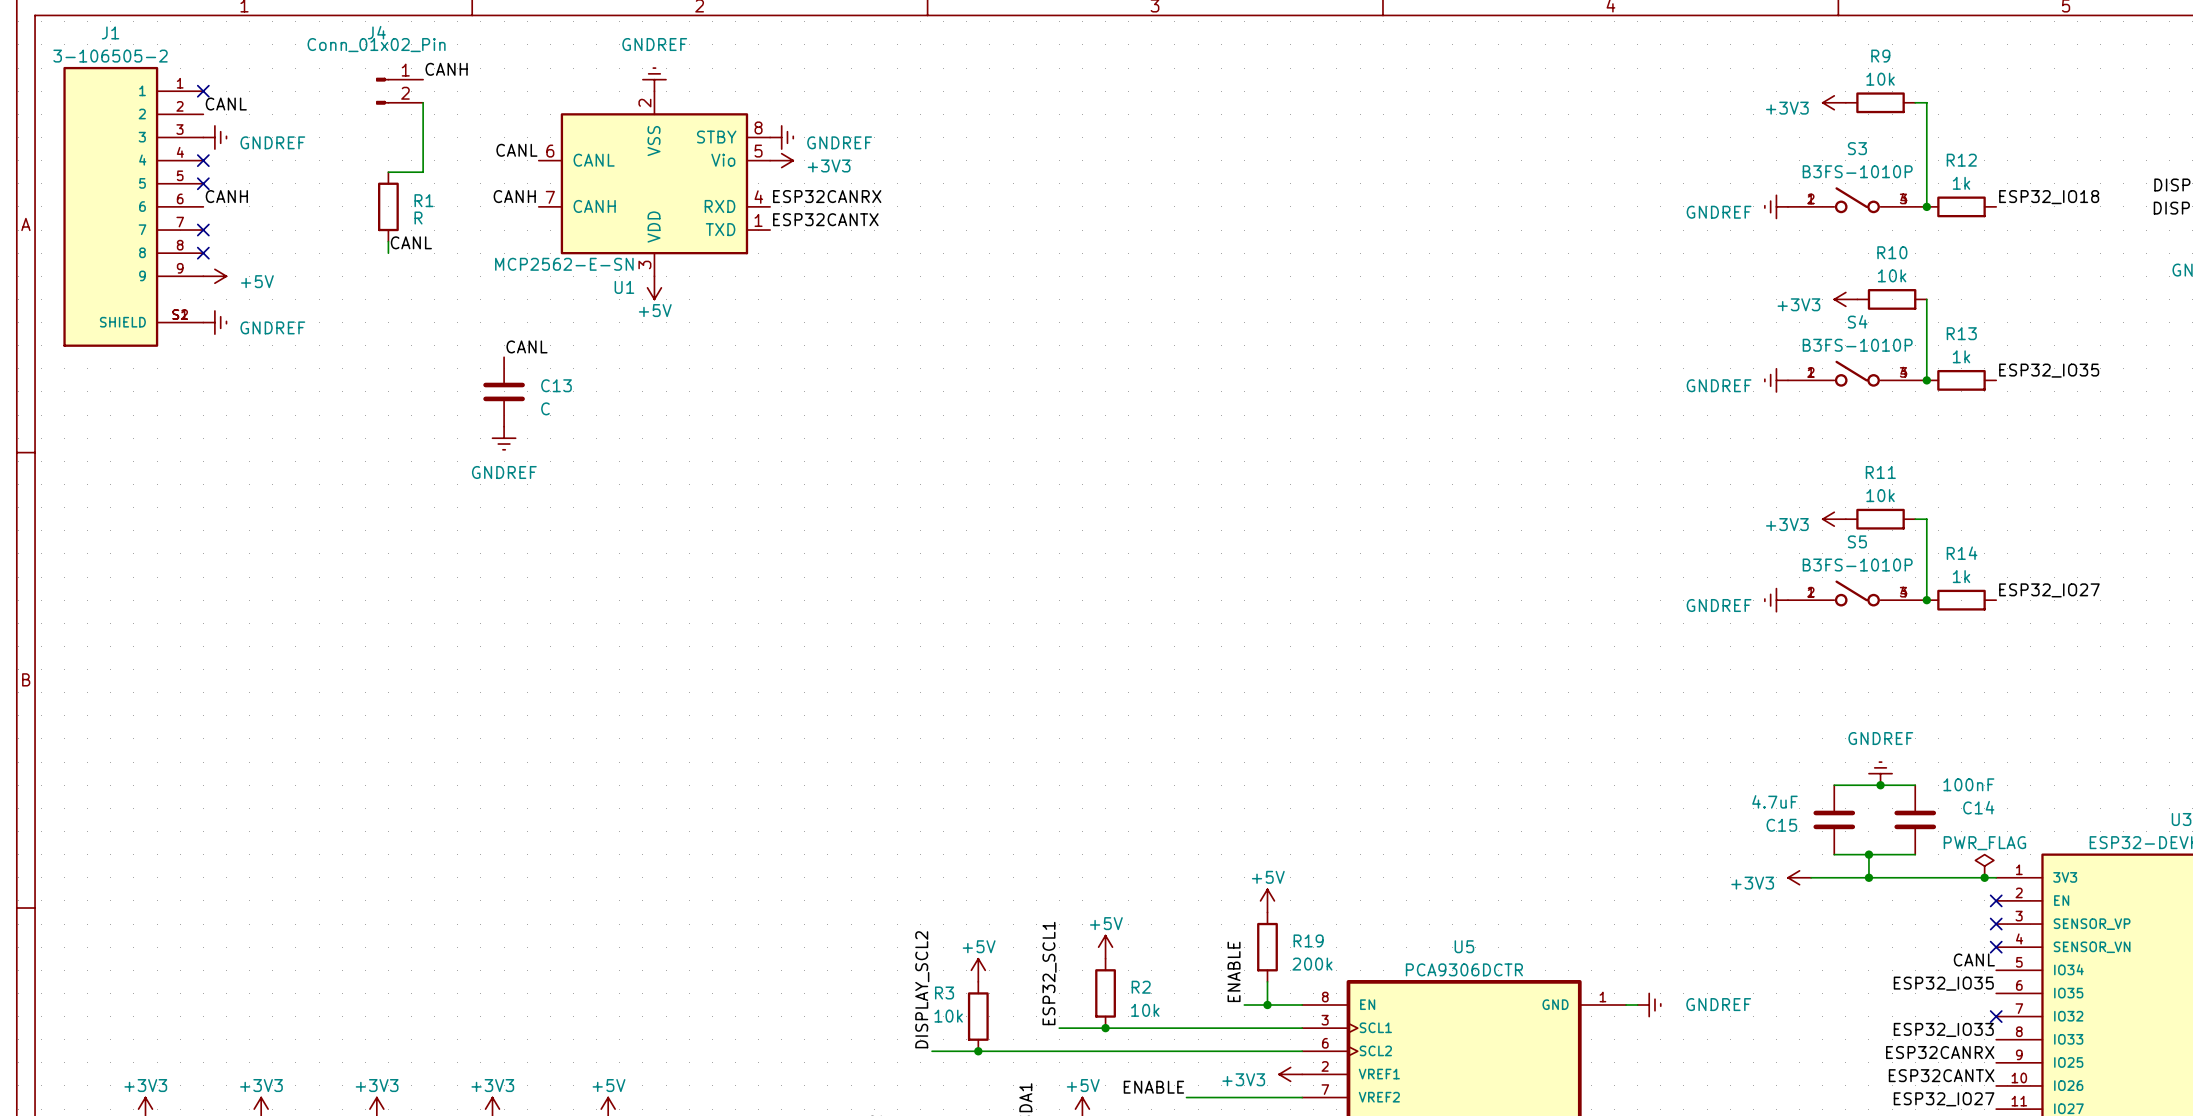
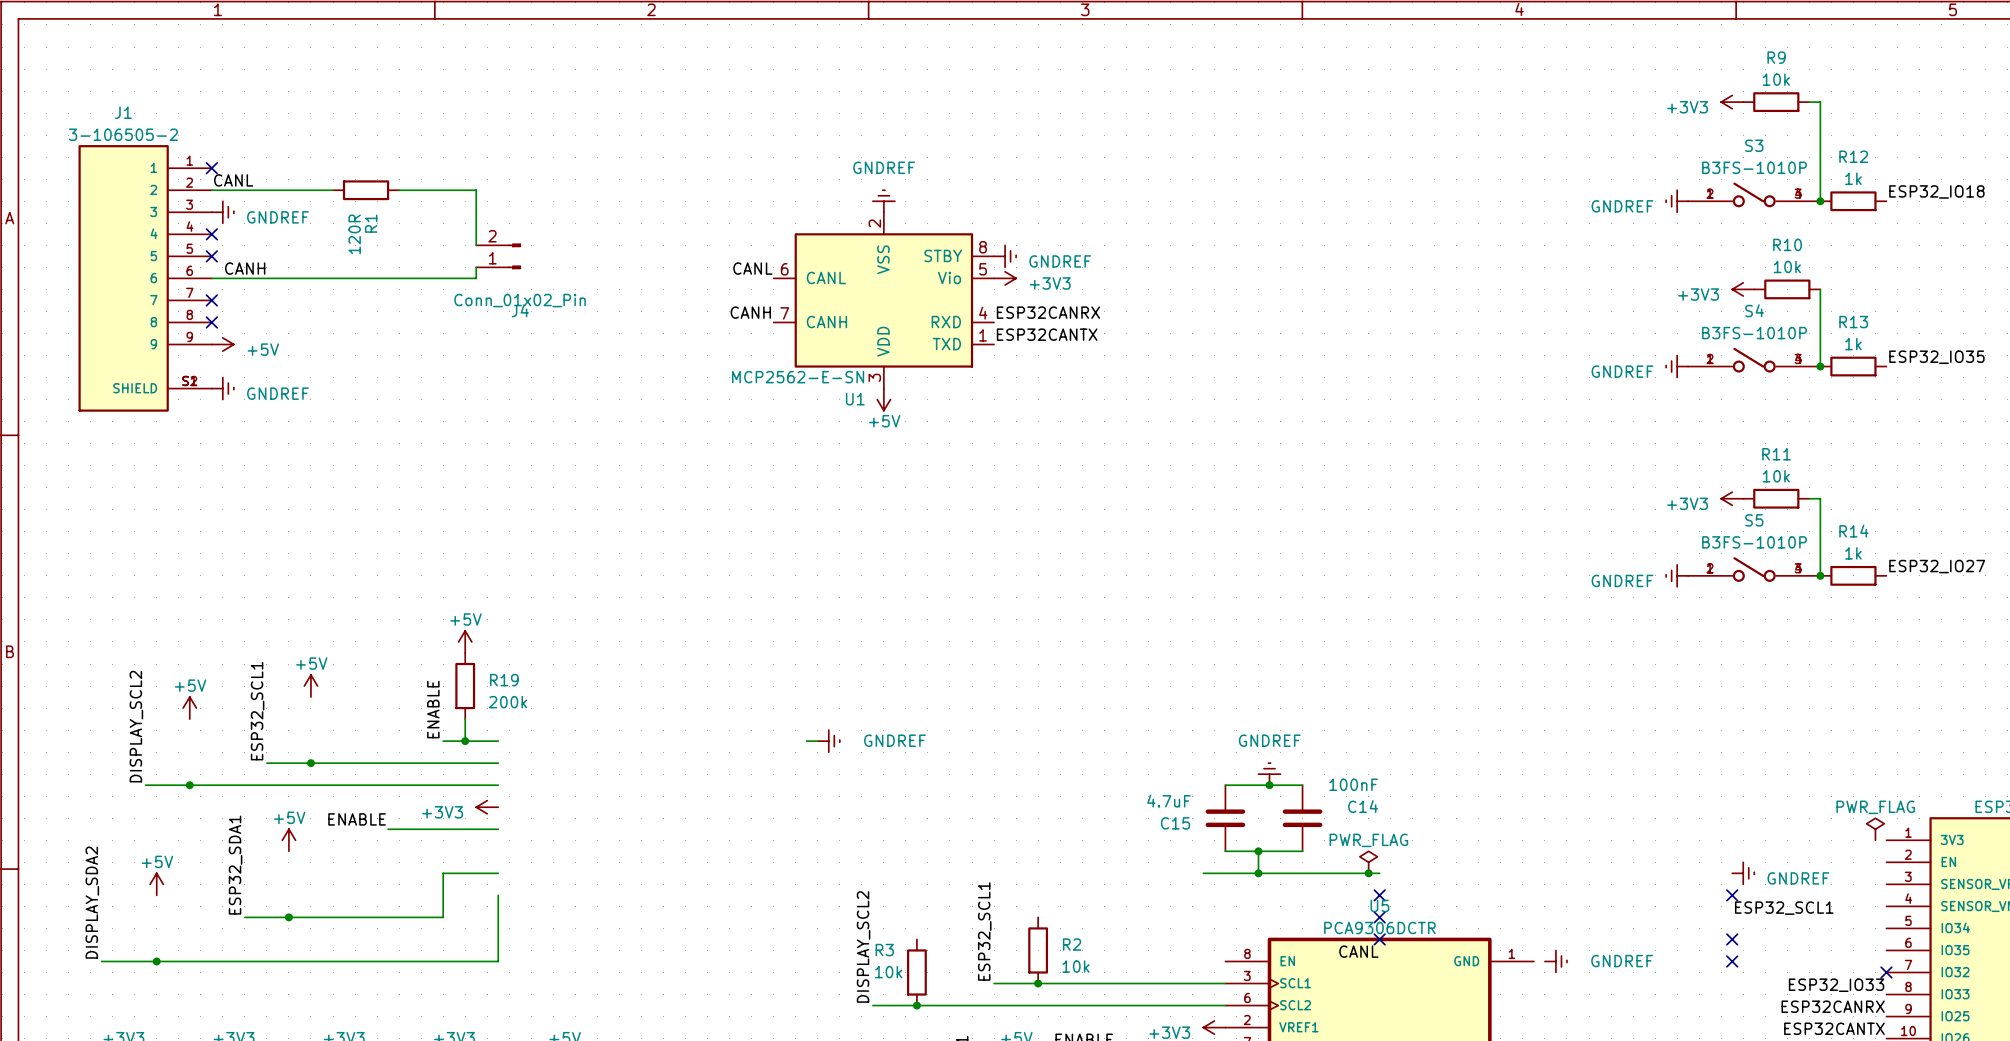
label: CANH (446, 69) -> none
power symbol: GNDREF (654, 79) -> none
no-connect mark: (203, 91) -> none
J4 rotation: 0° (382, 91) -> 180° (514, 256)
J4 position: (399, 91) -> (498, 256)
wire: (423, 102) (423, 172) (388, 172) -> none
label: CANL (226, 104) -> none
power symbol: GNDREF (214, 137) -> none
power symbol: GNDREF (781, 137) -> none
label: CANL (516, 150) -> none
no-connect mark: (203, 160) -> none
power symbol: +3V3 (781, 160) -> none
no-connect mark: none -> (211, 168)
no-connect mark: (203, 183) -> none
U1 position: (654, 183) -> (883, 300)
label: none -> CANL (233, 180)
wire: none -> (211, 190) (333, 190)
wire: none -> (399, 190) (476, 190) (476, 245)
label position: CANH (226, 196) -> CANH (245, 268)
label: CANH (514, 196) -> none
label: ESP32CANRX (827, 196) -> none
J1 position: (133, 206) -> (145, 278)
R1 rotation: 0° (388, 206) -> 90° clockwise (366, 190)
power symbol: none -> GNDREF (883, 201)
power symbol: none -> GNDREF (222, 212)
R1 value: R (418, 218) -> 120R (354, 234)
label: ESP32CANTX (825, 219) -> none
no-connect mark: (203, 230) -> none
no-connect mark: none -> (211, 234)
wire: (388, 241) (388, 253) -> none
label: CANL (411, 242) -> none
no-connect mark: (203, 253) -> none
no-connect mark: none -> (211, 256)
power symbol: none -> GNDREF (1005, 256)
power symbol position: +5V (214, 276) -> +5V (222, 344)
wire: none -> (476, 267) (476, 278) (211, 278)
label: none -> CANL (752, 268)
power symbol: +5V (654, 287) -> none
power symbol: none -> +3V3 (1005, 278)
no-connect mark: none -> (211, 300)
power symbol: GNDREF (214, 322) -> none
label: none -> CANH (750, 312)
label: none -> ESP32CANRX (1048, 312)
no-connect mark: none -> (211, 322)
label: CANL (527, 346) -> none
label: none -> ESP32CANTX (1047, 334)
C13: C (504, 391) -> none
power symbol: none -> GNDREF (222, 388)
power symbol: none -> +5V (883, 399)
power symbol: GNDREF (504, 438) -> none
power symbol: none -> +5V (465, 641)
power symbol: none -> +5V (310, 686)
power symbol: none -> +5V (189, 708)
power symbol text position: GNDREF (1880, 738) -> GNDREF (1798, 878)
label: none -> ENABLE (433, 709)
label: none -> ESP32_SCL1 (257, 711)
wire: none -> (465, 719) (465, 741)
label: none -> DISPLAY_SCL2 (136, 726)
wire: none -> (443, 741) (498, 741)
junction: none -> (465, 741)
wire: none -> (806, 741) (817, 741)
power symbol: none -> GNDREF (828, 741)
power symbol rotation: 0° (1880, 773) -> 90° clockwise (1743, 873)
power symbol position: GNDREF (1880, 773) -> GNDREF (1743, 873)
wire: (1834, 785) (1915, 785) -> none
junction: (1880, 785) -> none
wire: none -> (266, 763) (498, 763)
junction: none -> (310, 763)
power symbol: none -> GNDREF (1269, 774)
wire: none -> (145, 785) (498, 785)
junction: none -> (189, 785)
wire: none -> (1225, 785) (1302, 785)
junction: none -> (1269, 785)
C15 position: (1834, 819) -> (1225, 818)
C14 position: (1915, 819) -> (1302, 818)
power symbol: none -> +3V3 (487, 807)
wire: (1834, 854) (1915, 854) -> none
wire: (1868, 854) (1868, 877) -> none
junction: (1868, 854) -> none
label: none -> ENABLE (357, 819)
wire: none -> (388, 829) (498, 829)
power symbol: none -> +5V (288, 840)
power symbol: +3V3 (1799, 877) -> none
wire: (1811, 877) (1996, 877) -> none
junction: (1868, 877) -> none
junction: (1984, 877) -> none
wire: none -> (1225, 851) (1302, 851)
junction: none -> (1258, 851)
power symbol: +5V (1267, 900) -> none
power symbol: none -> PWR_FLAG (1368, 862)
no-connect mark: (1996, 900) -> none
label: none -> ESP32_SDA1 (235, 865)
wire: none -> (498, 873) (443, 873) (443, 917) (244, 917)
wire: none -> (1203, 873) (1379, 873)
junction: none -> (1258, 873)
junction: none -> (1368, 873)
power symbol: none -> +5V (156, 884)
no-connect mark: (1996, 924) -> none
wire: none -> (498, 895) (498, 961) (101, 961)
no-connect mark: none -> (1379, 895)
no-connect mark: none -> (1732, 895)
label: none -> DISPLAY_SDA2 (92, 902)
power symbol: +5V (1105, 947) -> none
R19 position: (1267, 947) -> (465, 686)
no-connect mark: (1996, 947) -> none
label: none -> ESP32_SCL1 (1784, 908)
junction: none -> (288, 917)
no-connect mark: none -> (1379, 917)
label: CANL (1974, 959) -> none
power symbol: +5V (978, 970) -> none
label: ENABLE (1234, 971) -> none
wire: (1267, 981) (1267, 1005) -> (1258, 851) (1258, 873)
no-connect mark: none -> (1379, 939)
no-connect mark: none -> (1732, 939)
label: ESP32_IO35 (1943, 983) -> none
label: none -> CANL (1358, 951)
junction: none -> (156, 961)
wire: (1244, 1005) (1302, 1005) -> none
junction: (1267, 1005) -> none
wire: (1626, 1005) (1637, 1005) -> none
no-connect mark: none -> (1732, 961)

